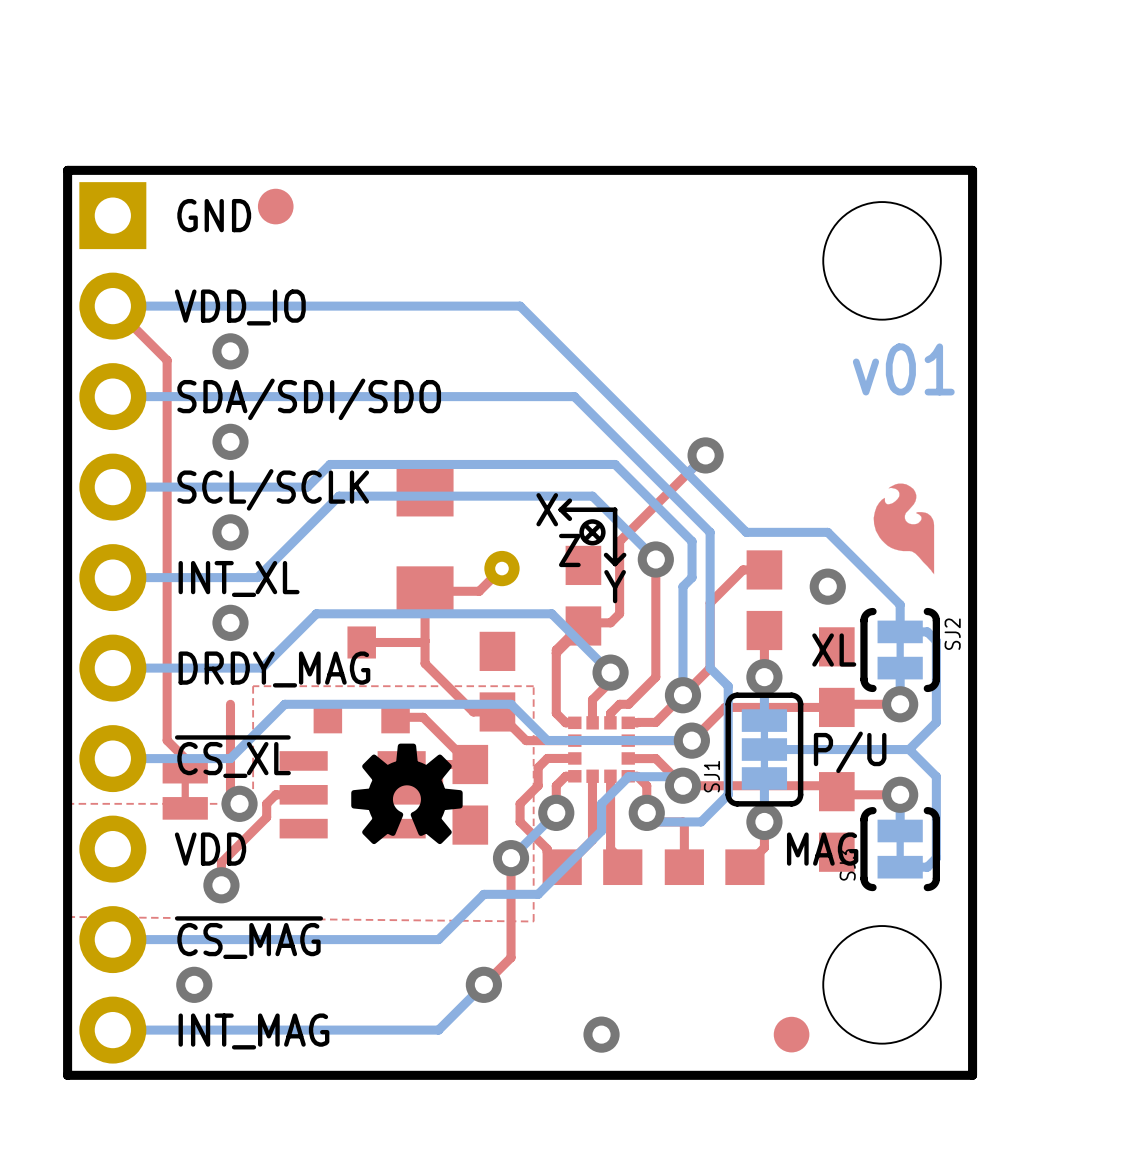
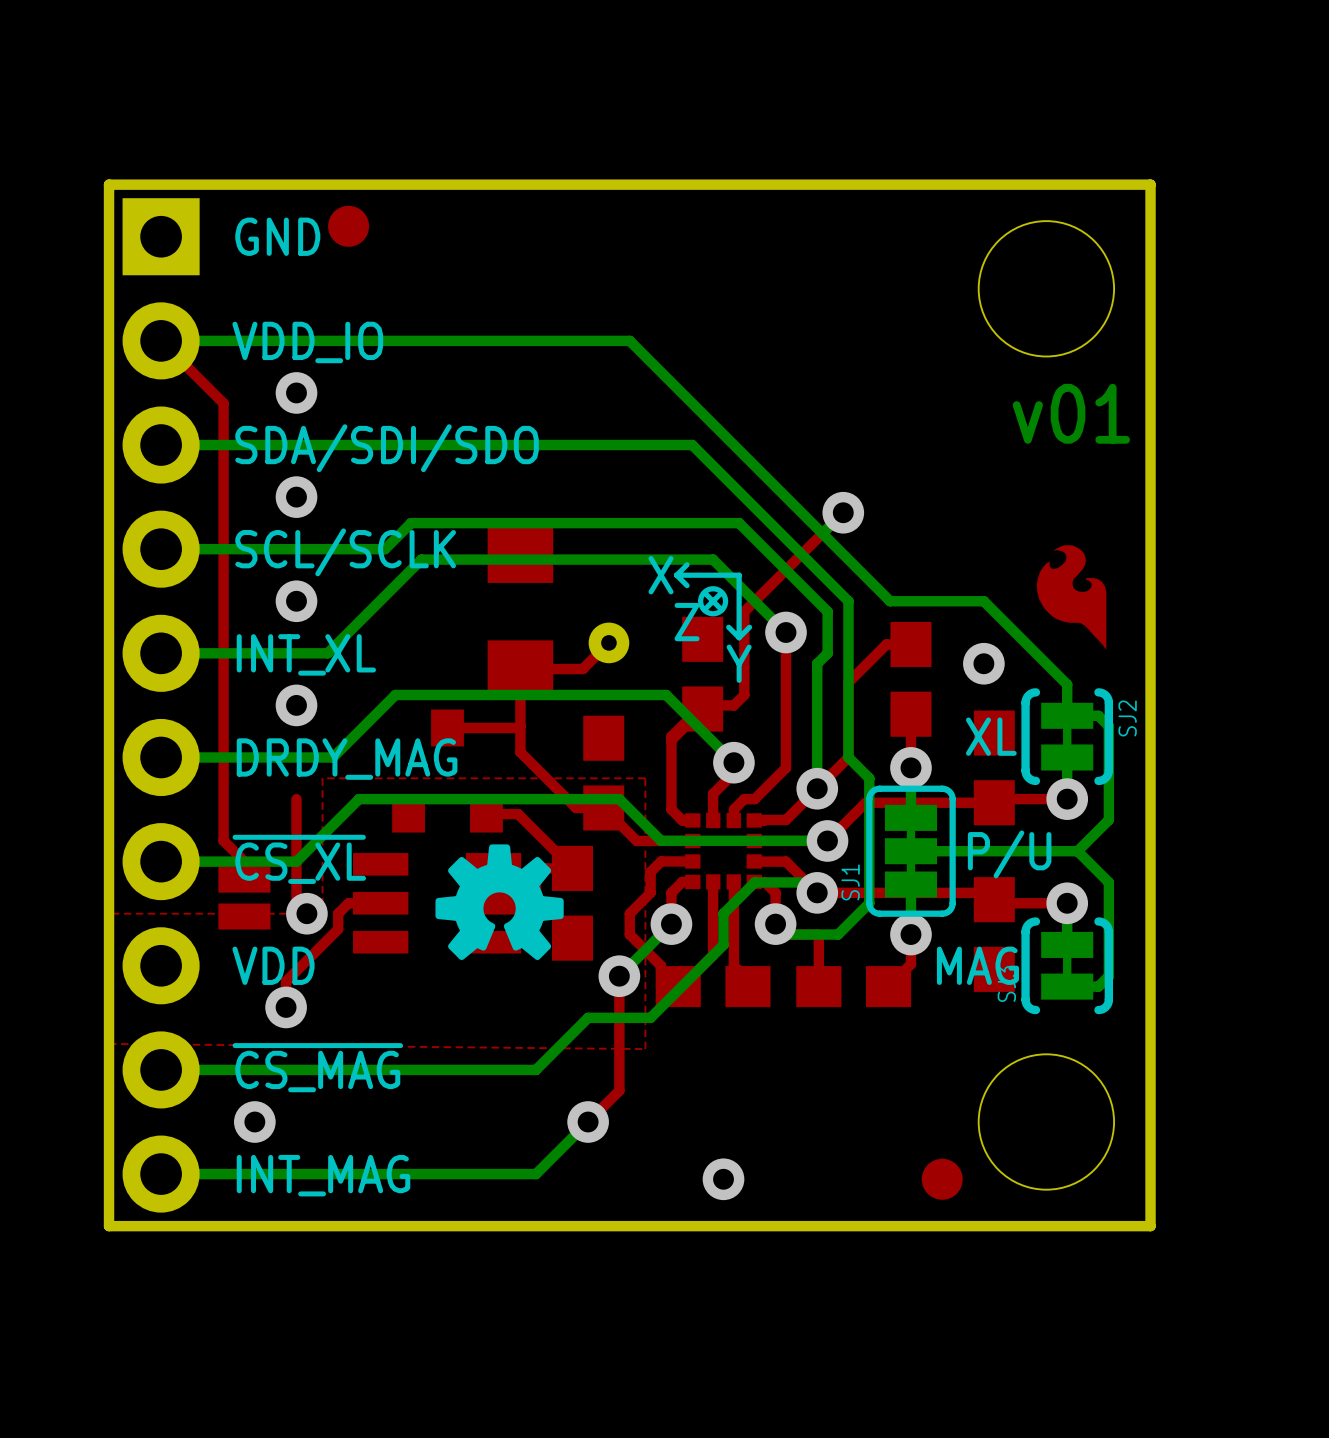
part footprint: [162, 760, 208, 820] -> [218, 866, 271, 930]

